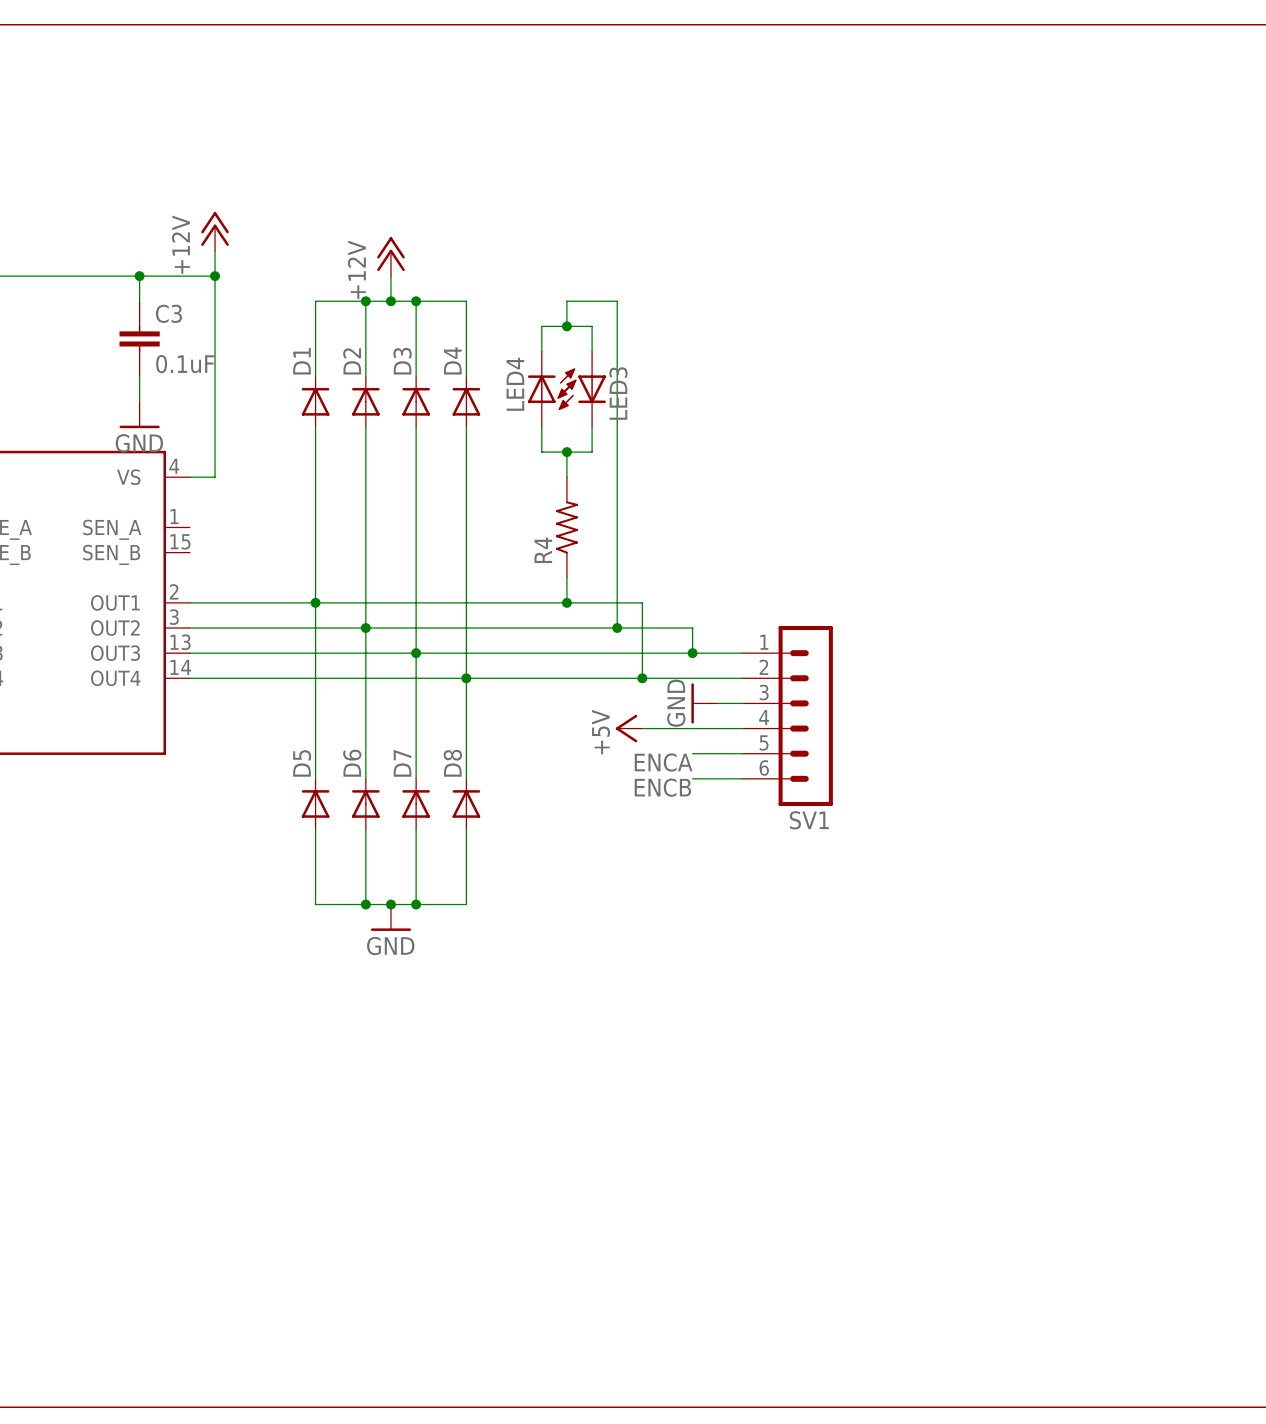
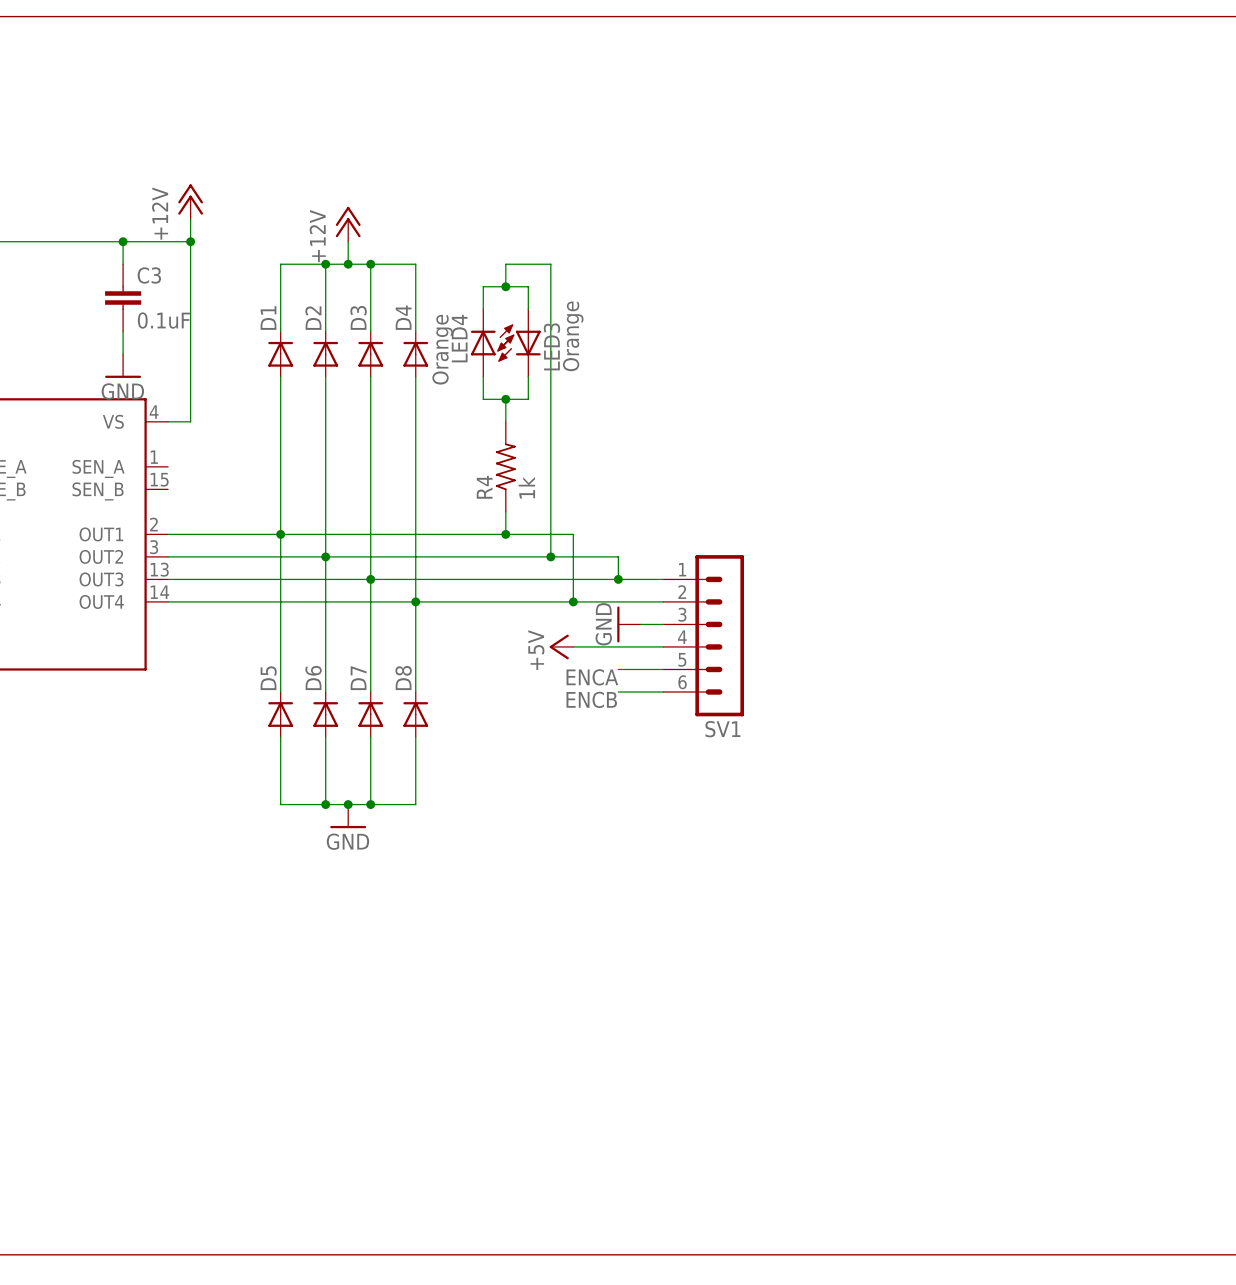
LED3 value: none -> Orange (573, 336)
LED4 value: none -> Orange (442, 349)
R4 value: none -> 1k (526, 487)

